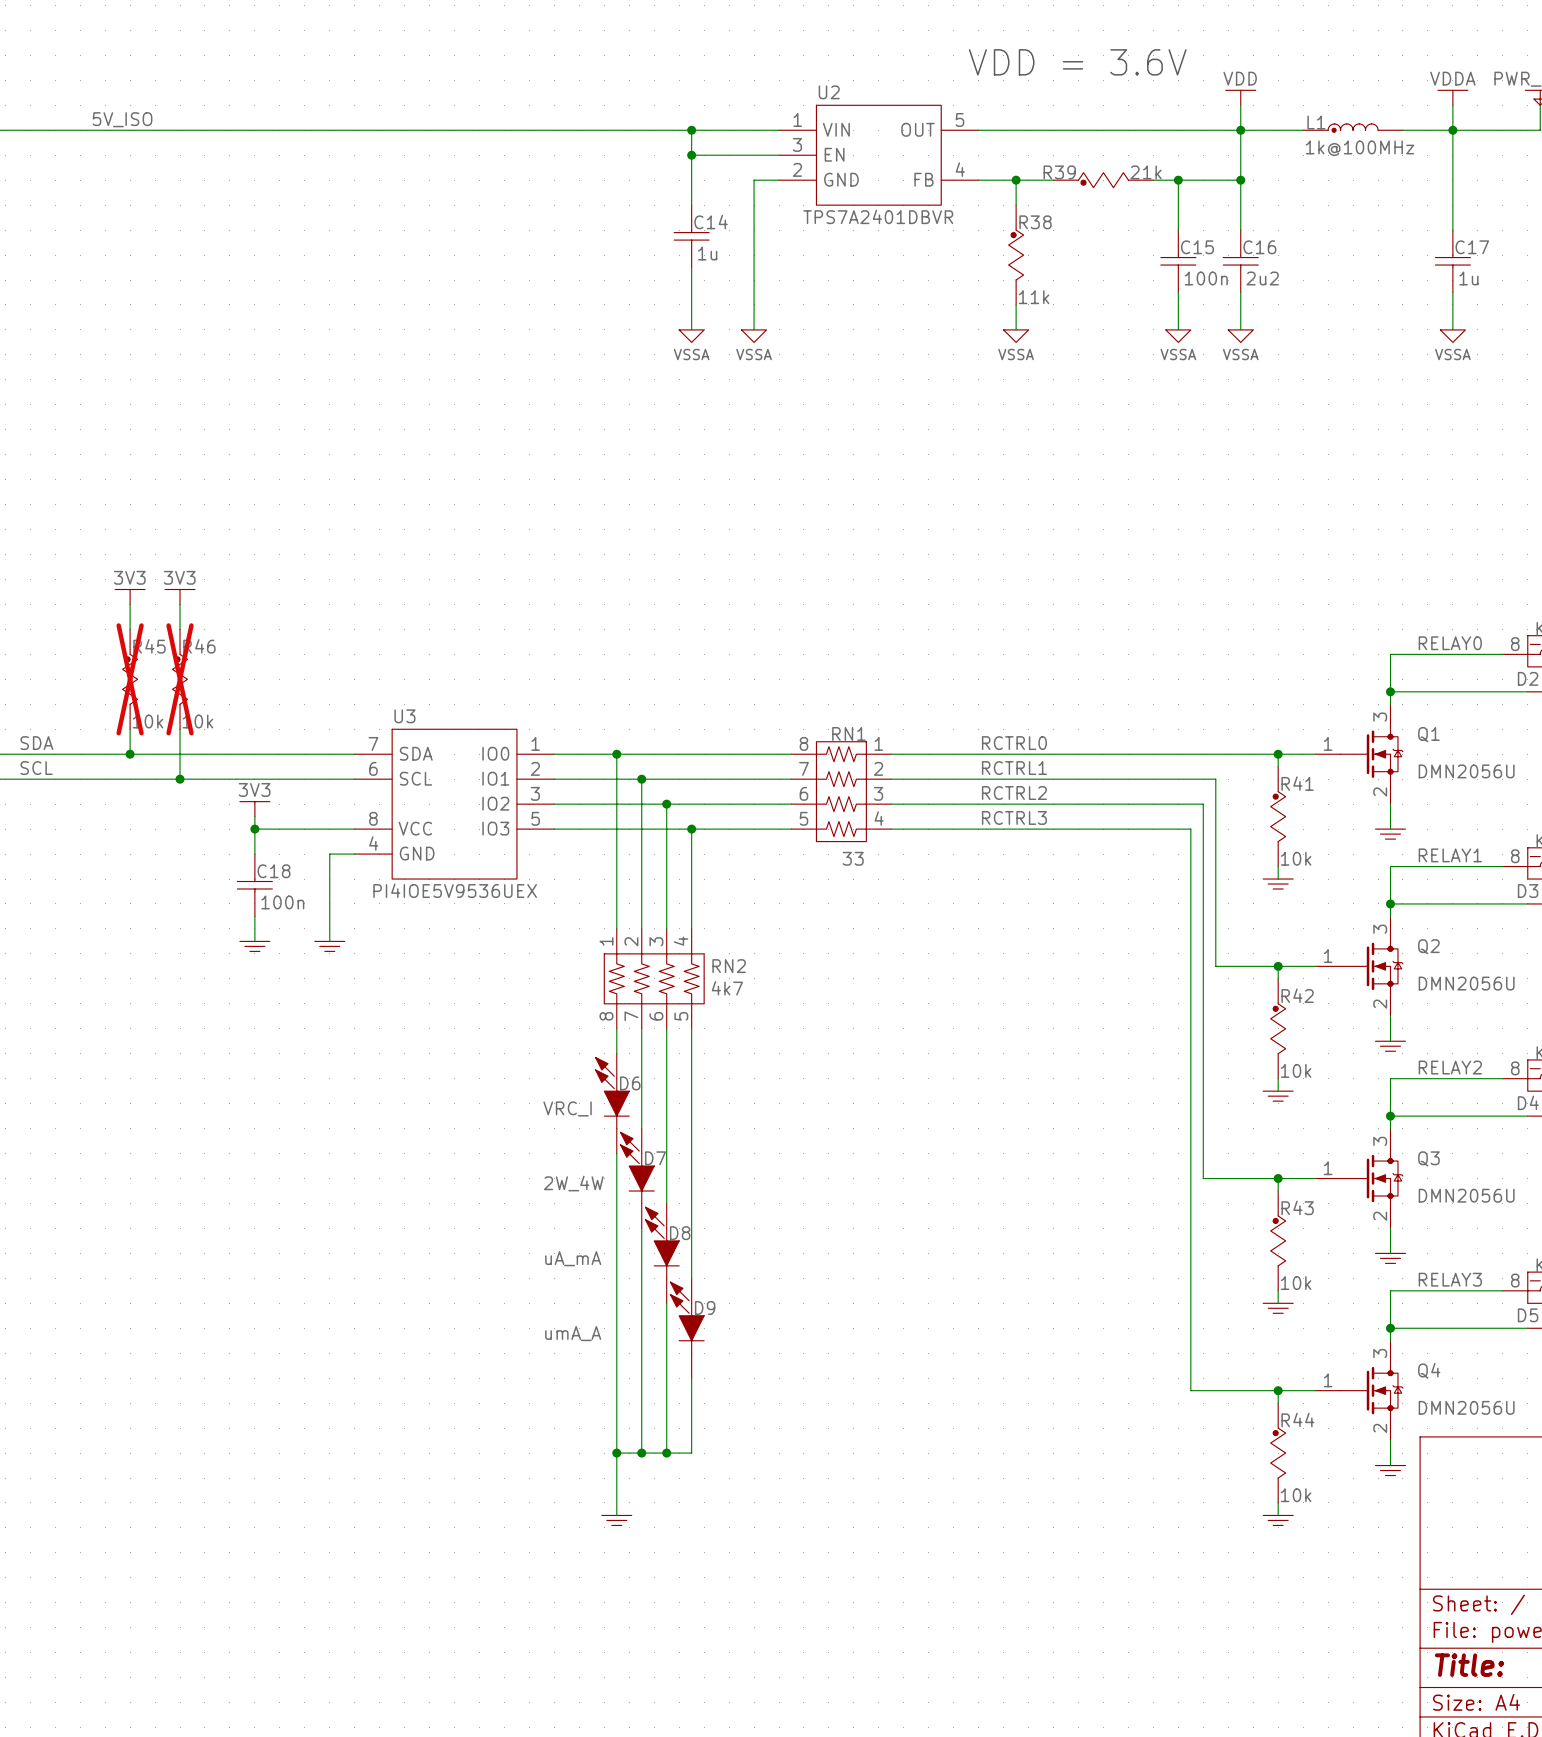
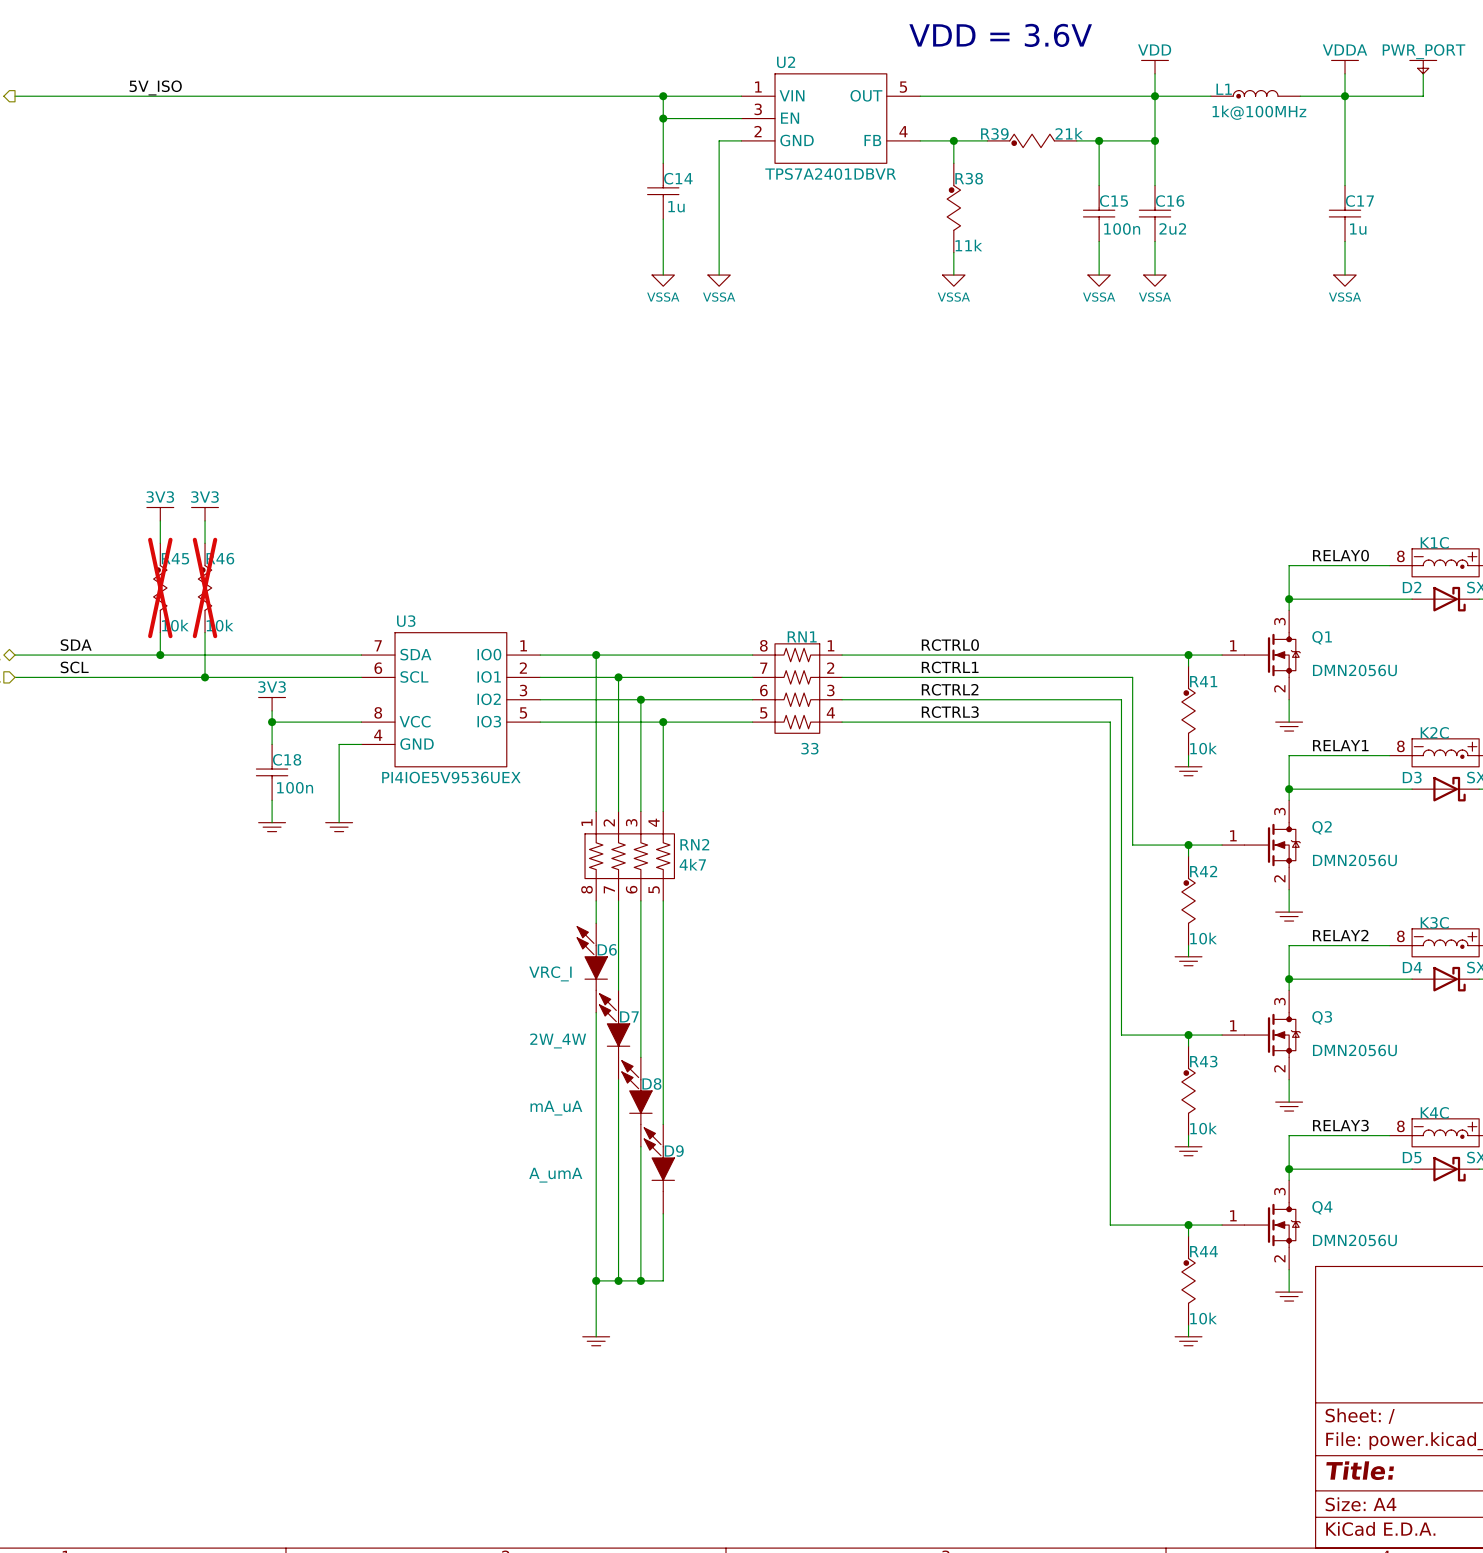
D8 value: uA_mA (573, 1258) -> mA_uA (556, 1108)
D9 value: umA_A (573, 1333) -> A_umA (555, 1175)

